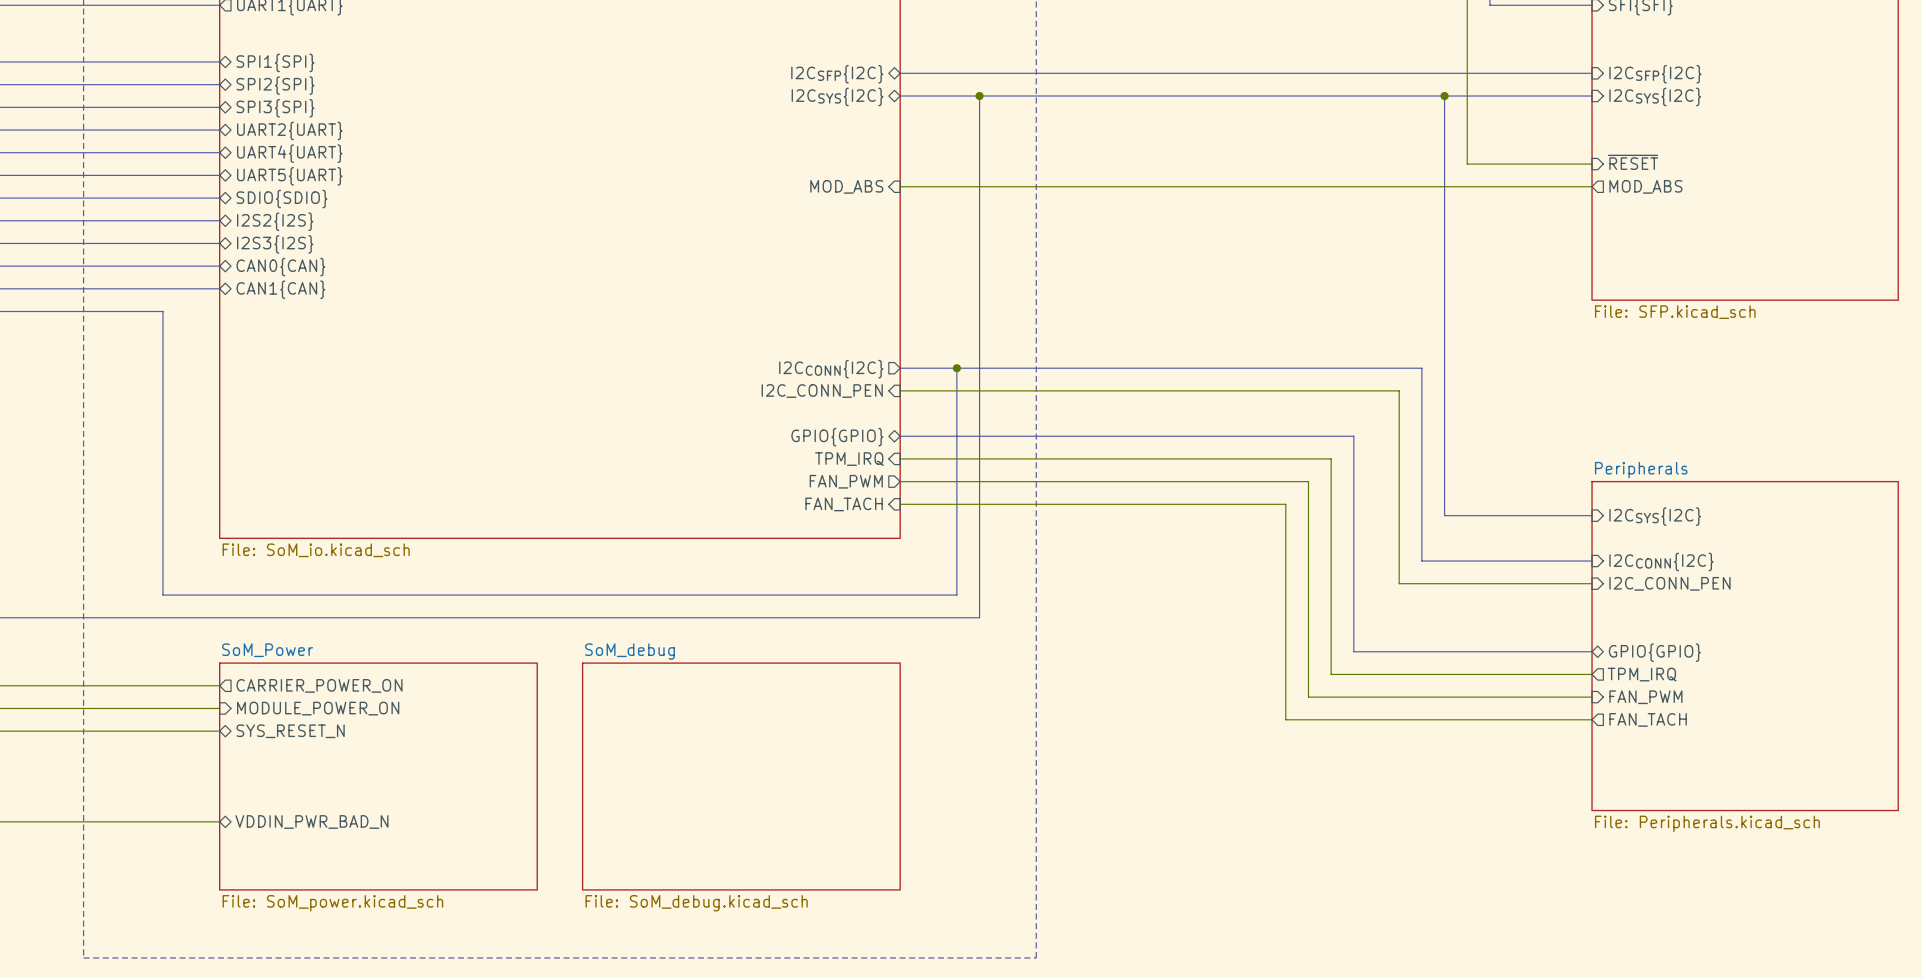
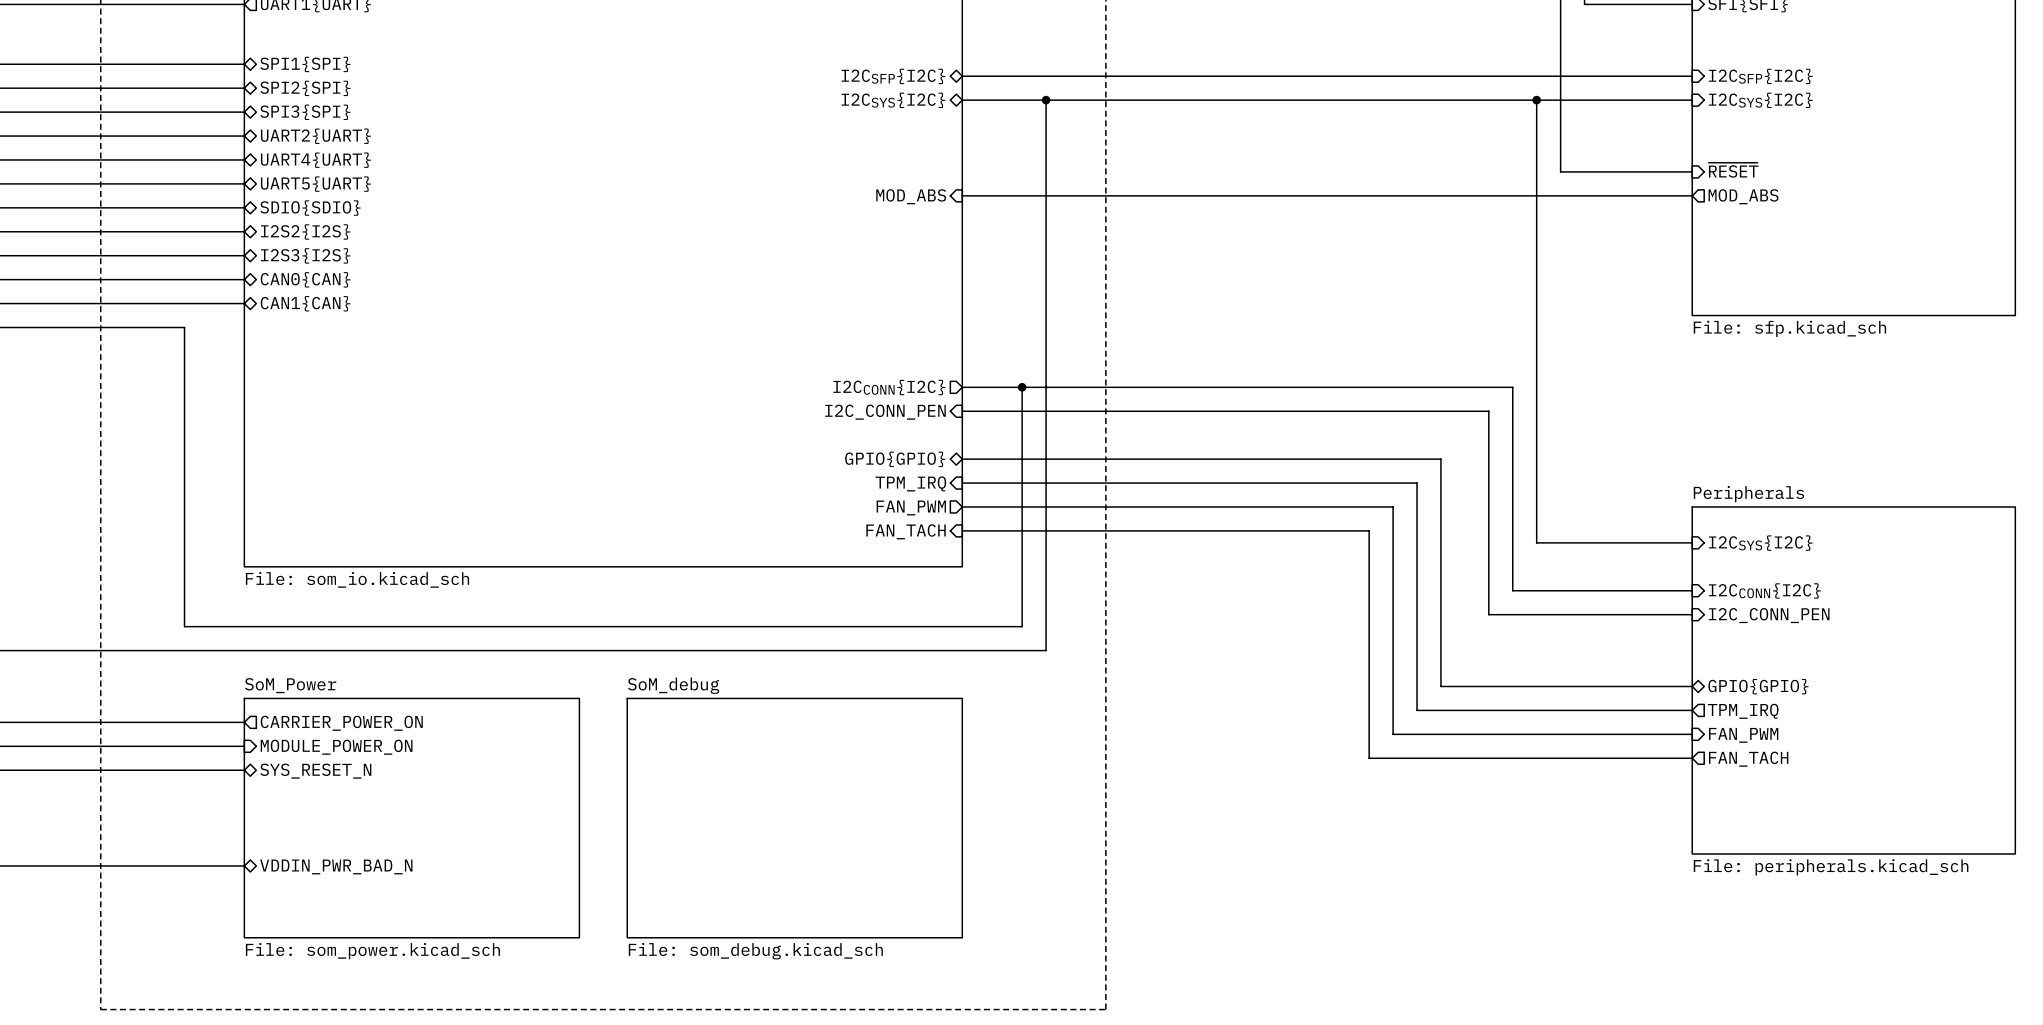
sheet value: File: SFP.kicad_sch (1675, 312) -> File: sfp.kicad_sch (1789, 328)
sheet value: File: SoM_io.kicad_sch (316, 550) -> File: som_io.kicad_sch (357, 579)
sheet Peripherals value: File: Peripherals.kicad_sch (1707, 823) -> File: peripherals.kicad_sch (1831, 867)
sheet SoM_Power value: File: SoM_power.kicad_sch (332, 903) -> File: som_power.kicad_sch (372, 951)
sheet SoM_debug value: File: SoM_debug.kicad_sch (696, 903) -> File: som_debug.kicad_sch (755, 951)

